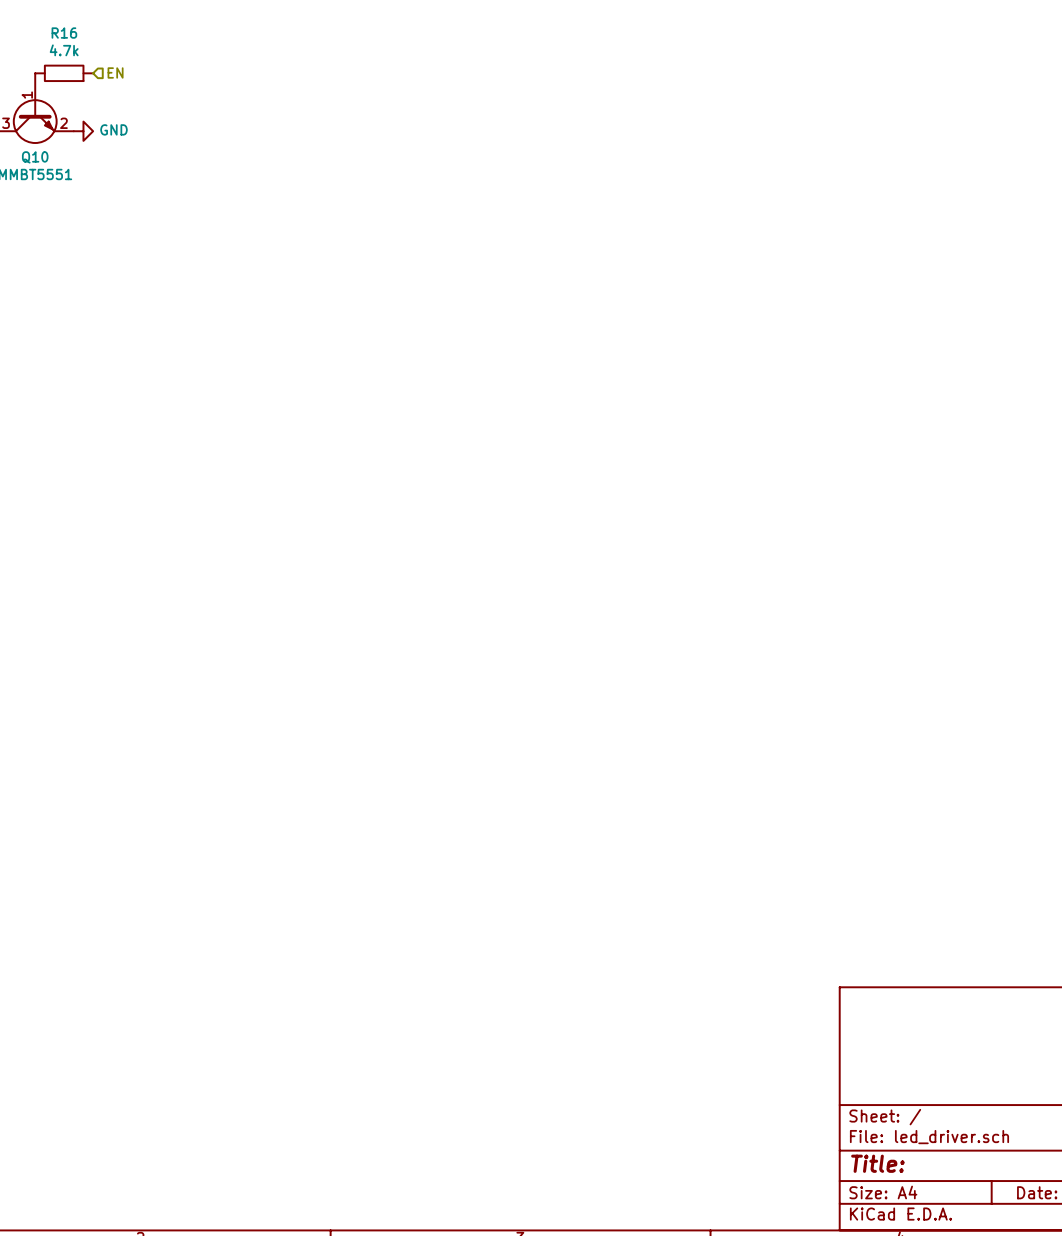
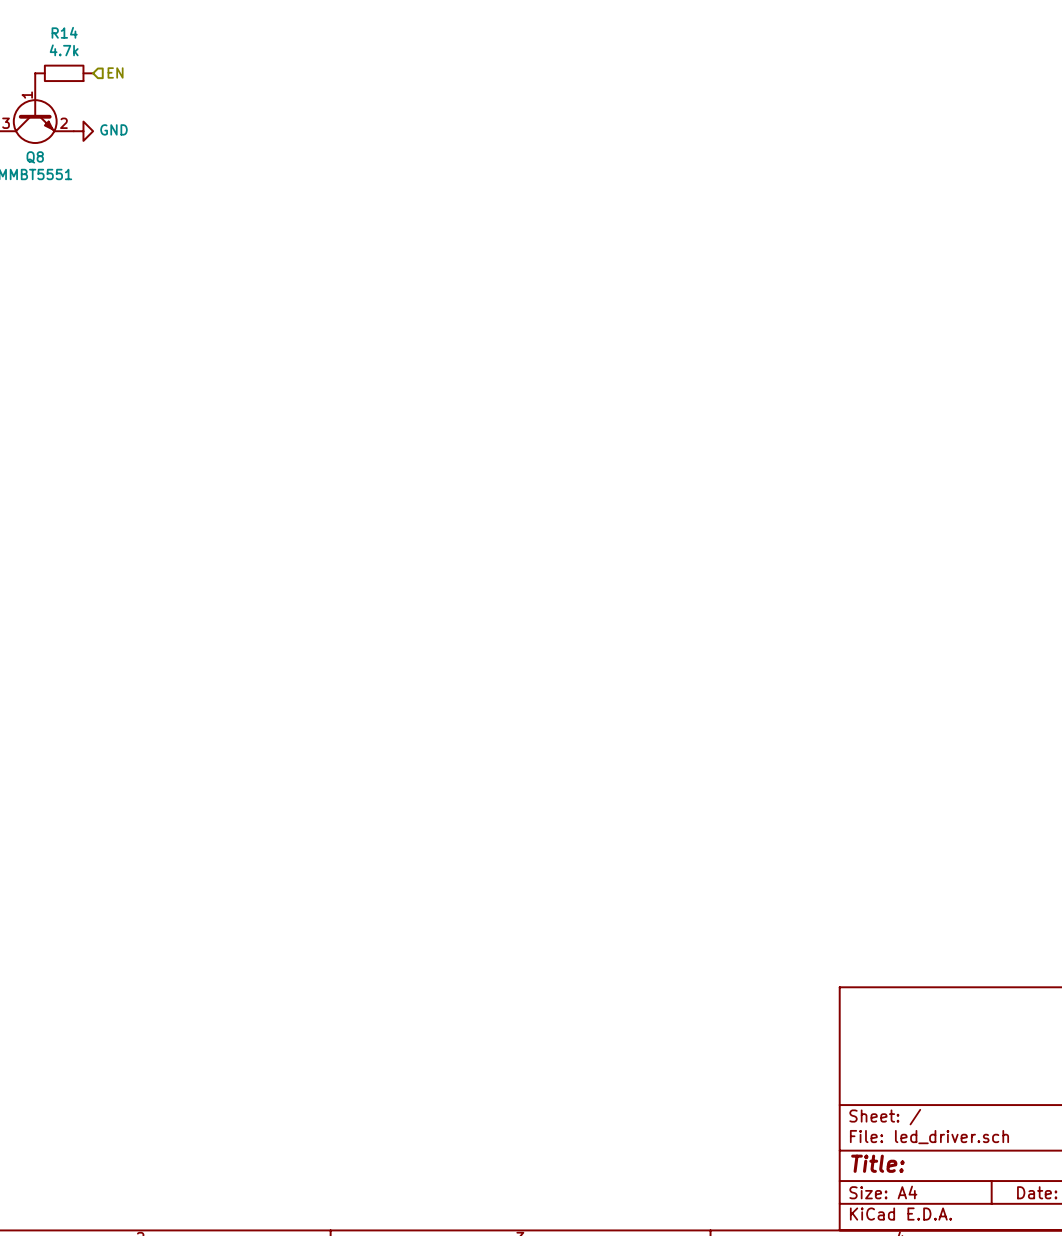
R16 name: R16 (64, 33) -> R14 (64, 32)
Q10 name: Q10 (35, 157) -> Q8 (35, 157)

